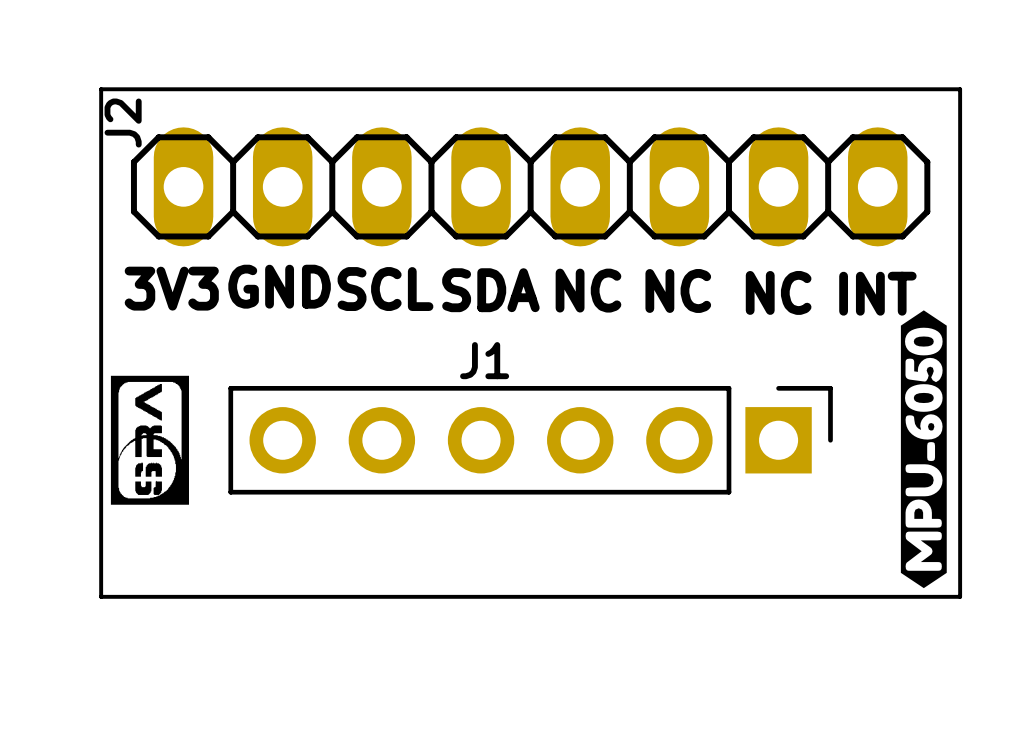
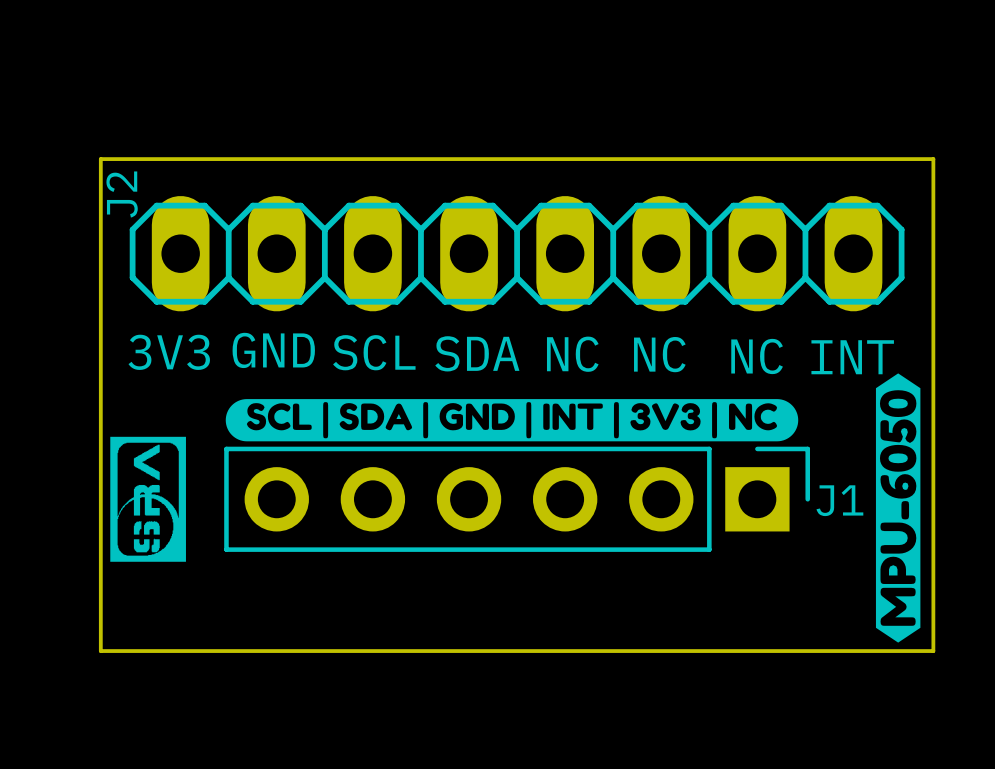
drawing: none -> [225, 399, 799, 442]
J1 name position: J1 (484, 360) -> J1 (839, 500)

